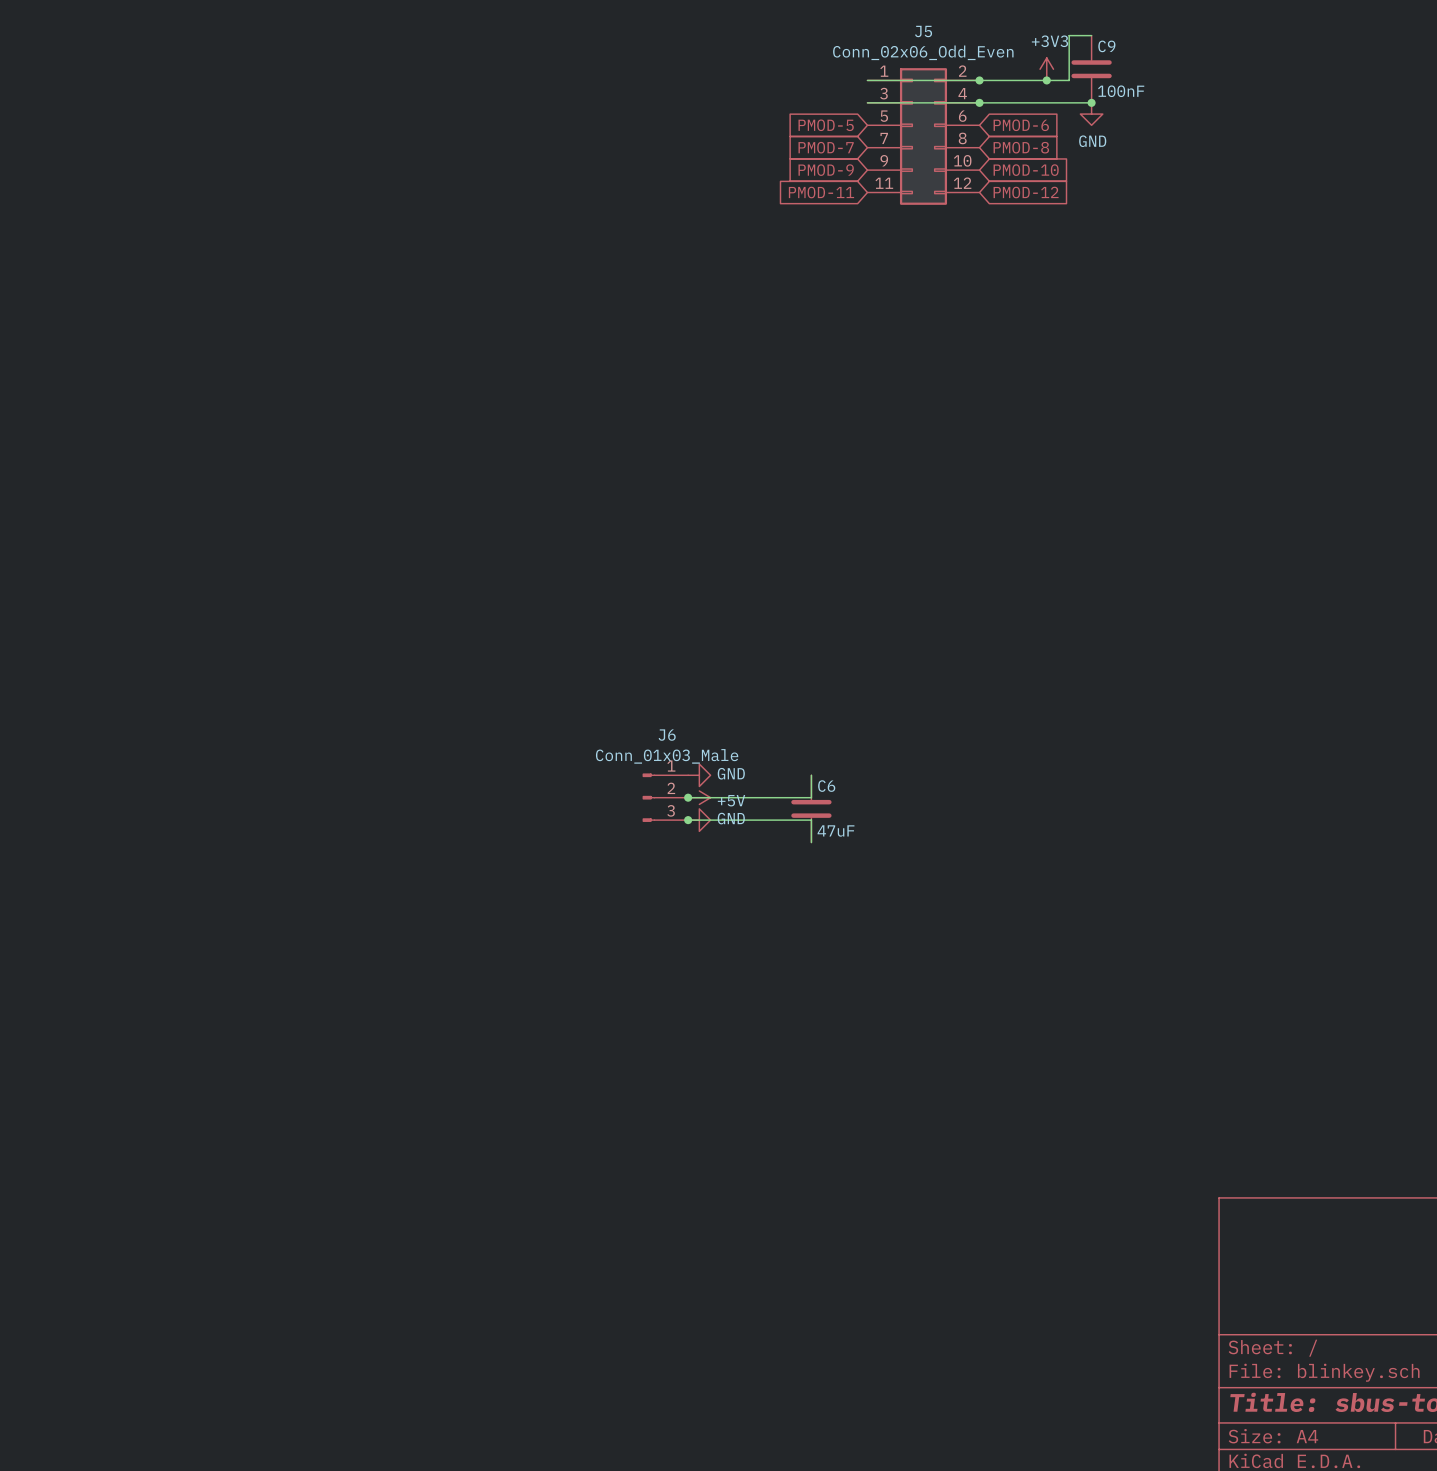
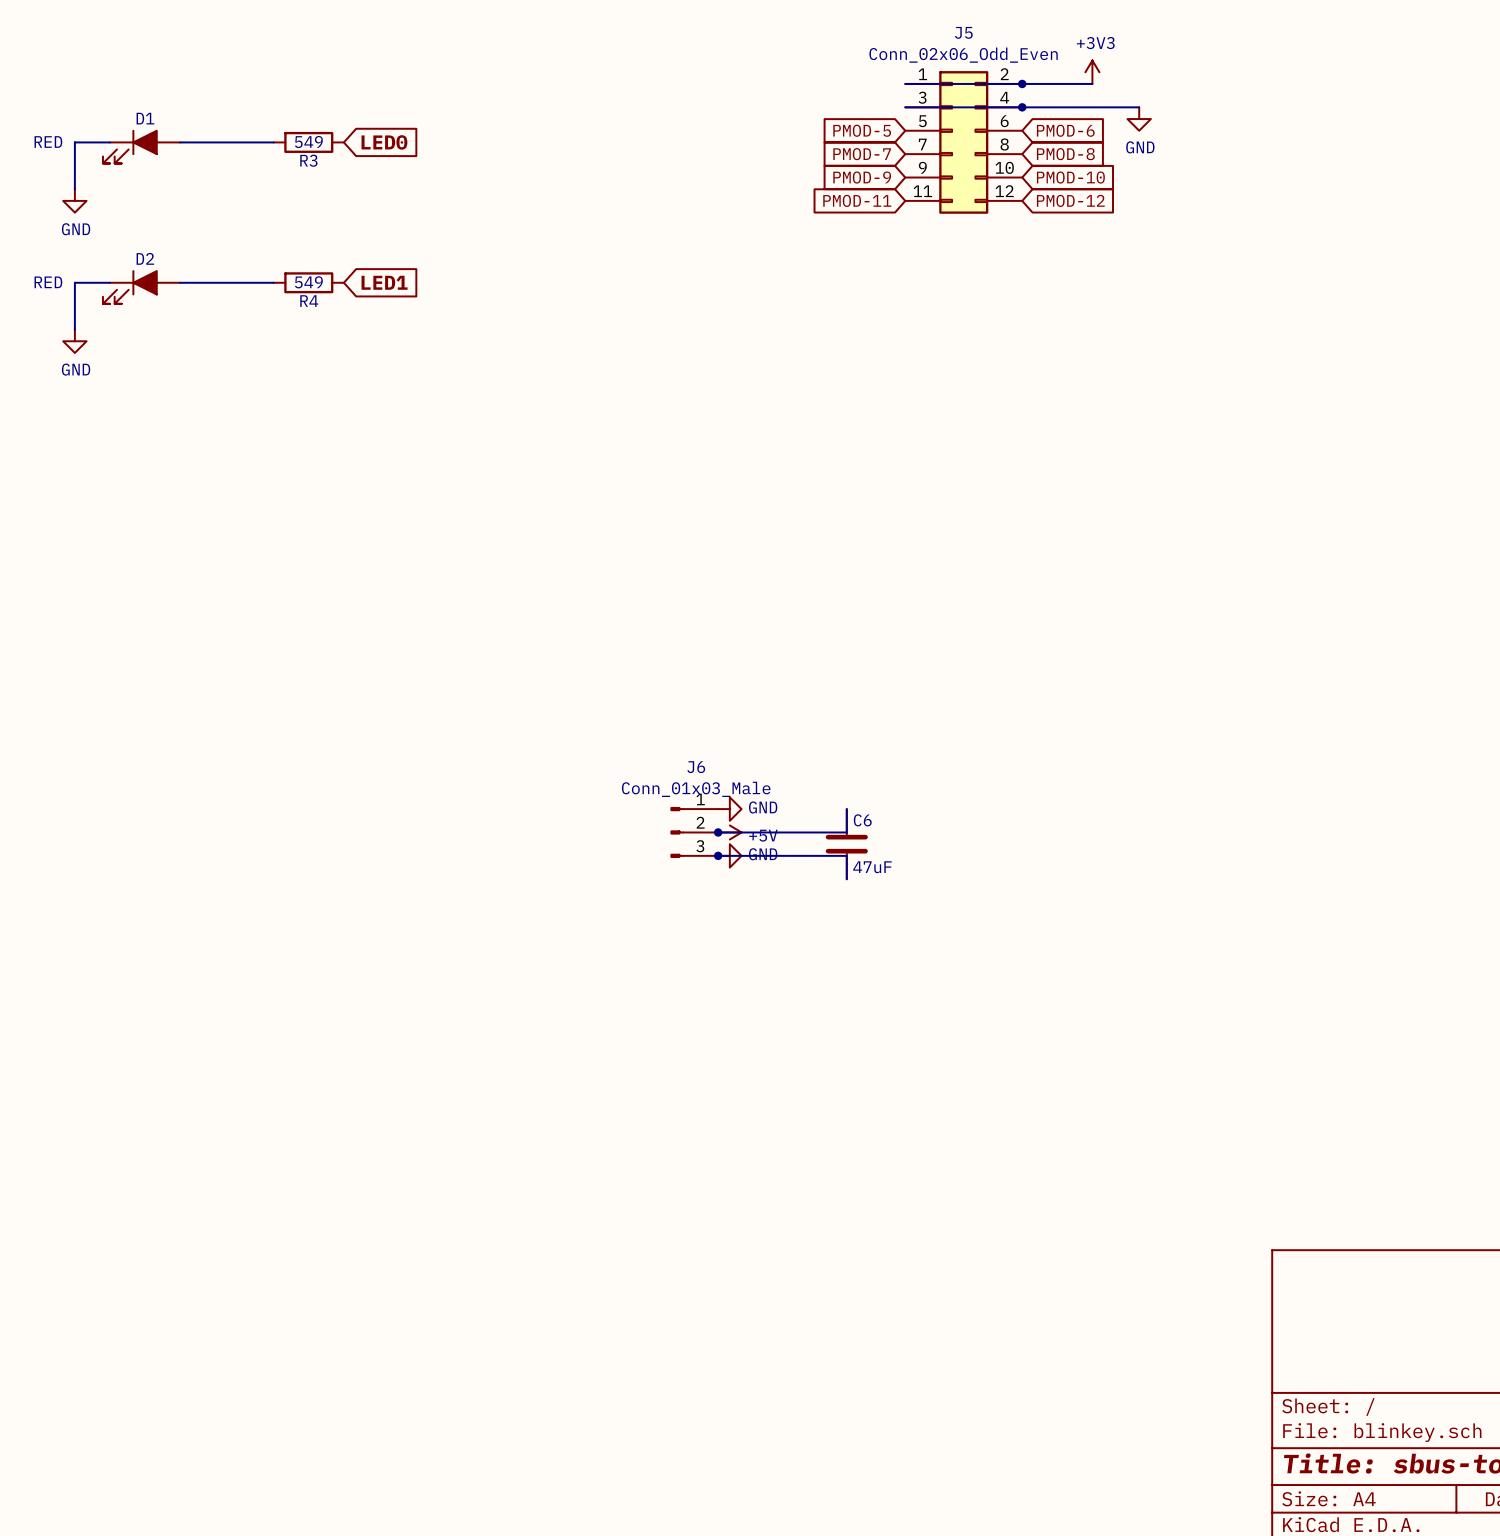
wire: (1091, 35) (1069, 35) (1069, 80) (1046, 80) -> none
C9: 100nF (1091, 69) -> none
junction: (1046, 80) -> none
junction: (1091, 102) -> none
wire: none -> (109, 142) (74, 142) (74, 189)
wire: none -> (180, 142) (273, 142)
R3: none -> 549 (308, 142)
global label: none -> LED0 (384, 142)
D1: none -> RED (141, 146)
power symbol: none -> GND (74, 200)
wire: none -> (109, 282) (74, 282) (74, 329)
wire: none -> (180, 282) (273, 282)
R4: none -> 549 (308, 282)
global label: none -> LED1 (384, 282)
D2: none -> RED (141, 286)
power symbol: none -> GND (74, 341)

